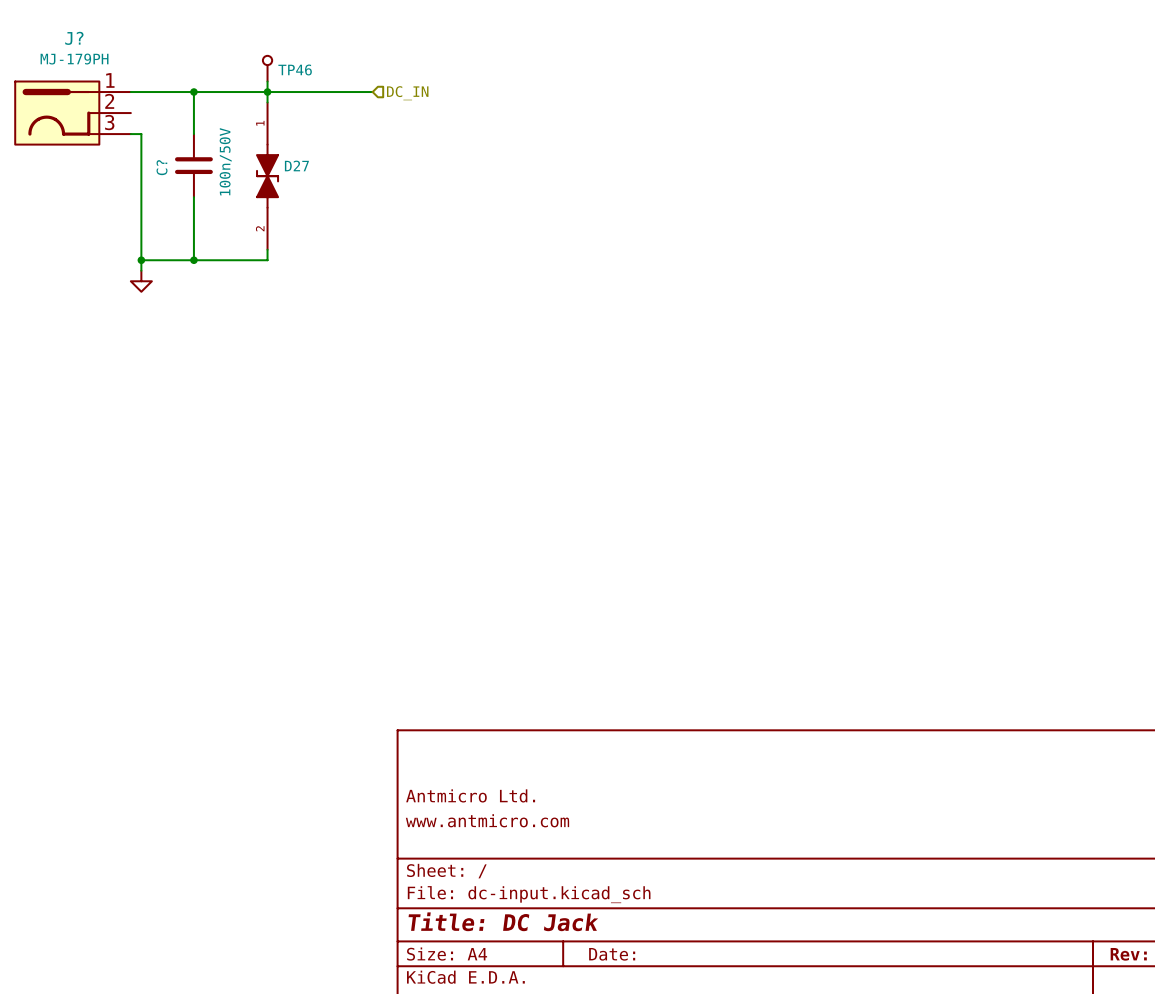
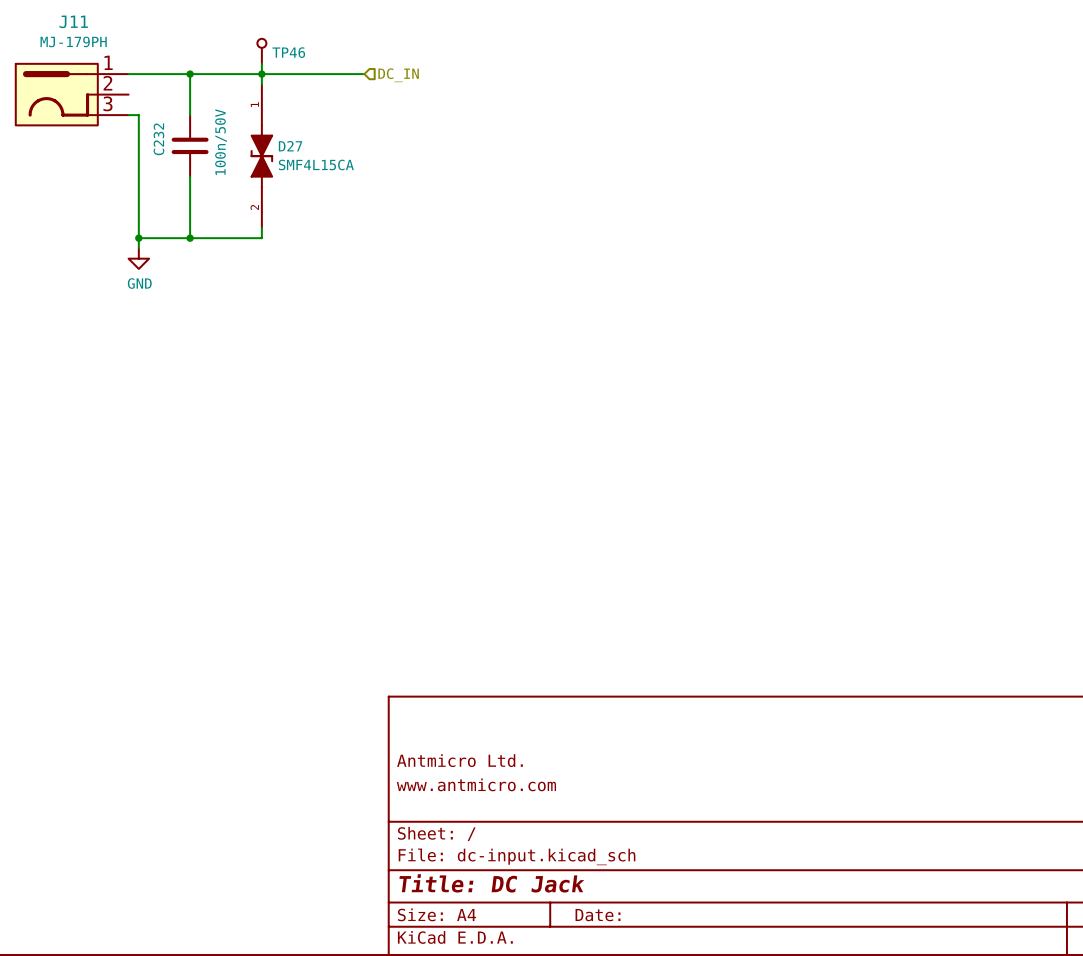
J? name: J? (74, 38) -> J11 (73, 21)
C? name: C? (162, 167) -> C232 (158, 139)
D27 value: none -> SMF4L15CA (316, 164)
power symbol text: none -> GND (139, 283)

